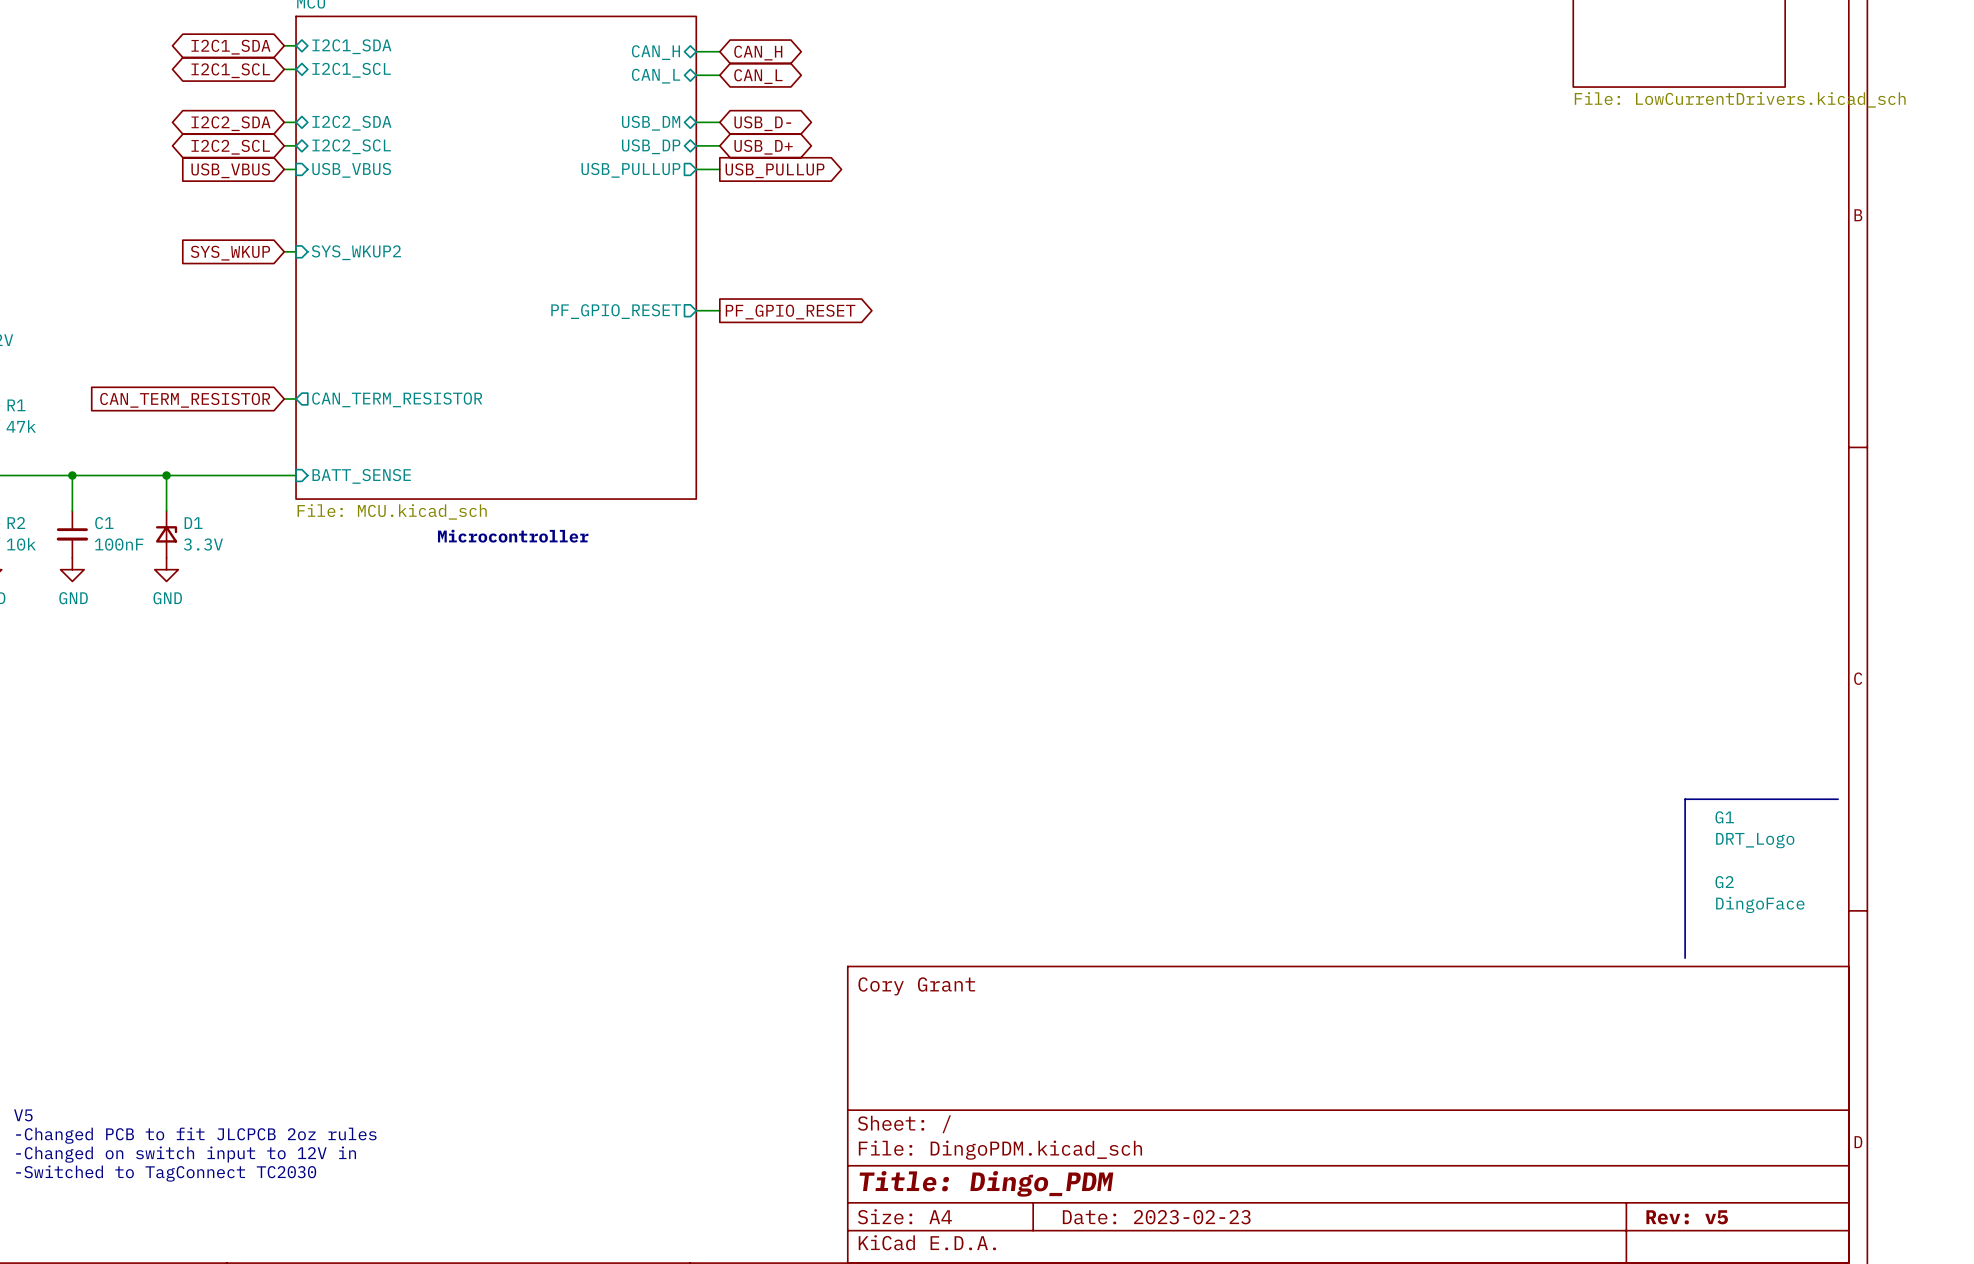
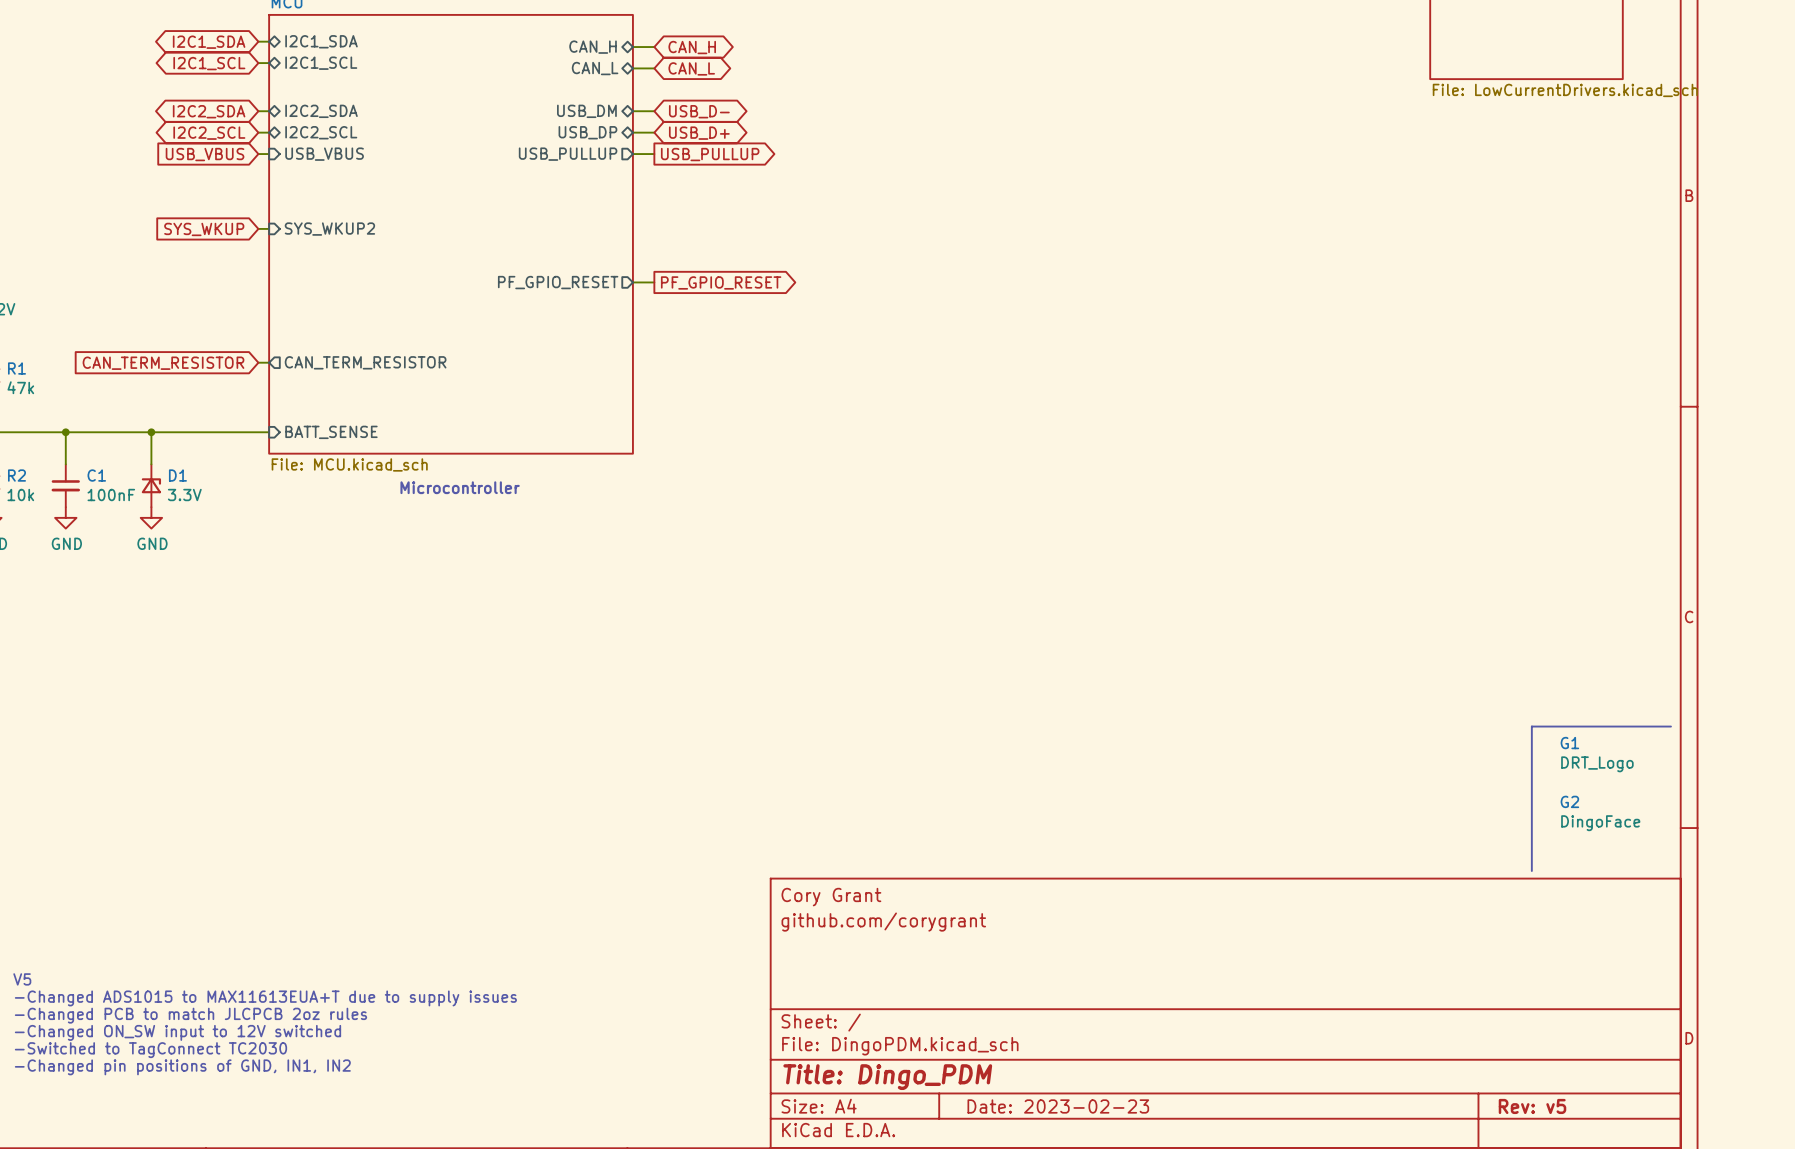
title block: none -> github.com/corygrant (883, 922)
text: none -> V5 (22, 979)
text: none -> -Changed ADS1015 to MAX11613EUA+T due to supply issues (265, 998)
text: V5 (23, 1115) -> -Changed PCB to match JLCPCB 2oz rules (190, 1015)
text: -Changed PCB to fit JLCPCB 2oz rules (196, 1135) -> -Changed ON_SW input to 12V switched (177, 1032)
text: -Changed on switch input to 12V in (186, 1154) -> -Switched to TagConnect TC2030 (150, 1050)
text: -Switched to TagConnect TC2030 (166, 1173) -> -Changed pin positions of GND, IN1, IN2 (182, 1067)

